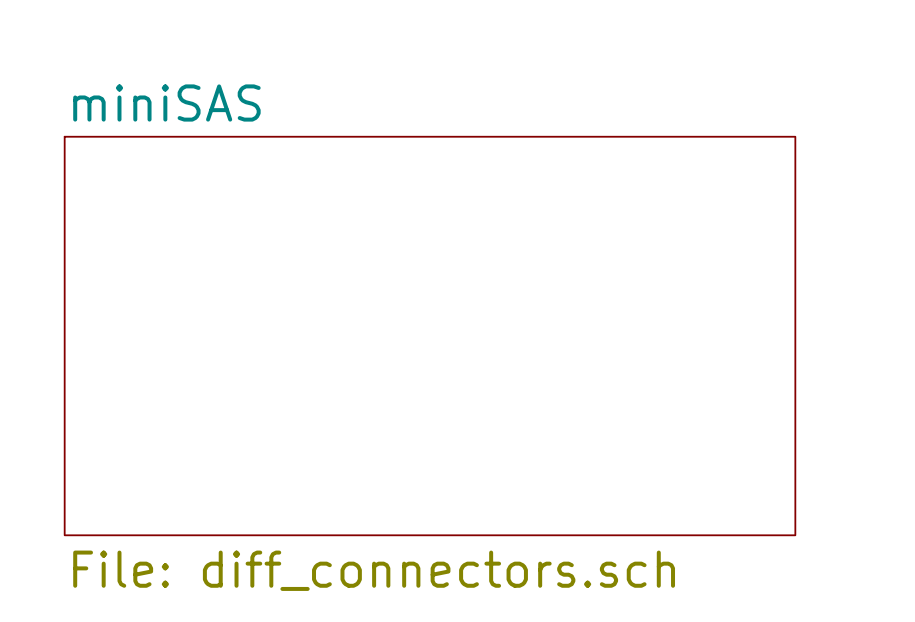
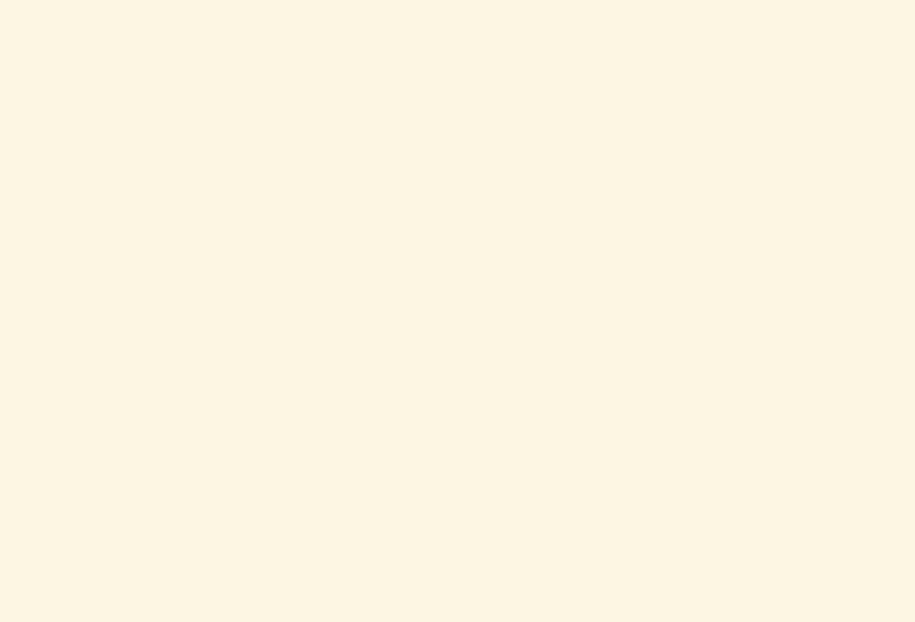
sheet miniSAS: File: diff_connectors.sch (430, 336) -> none

